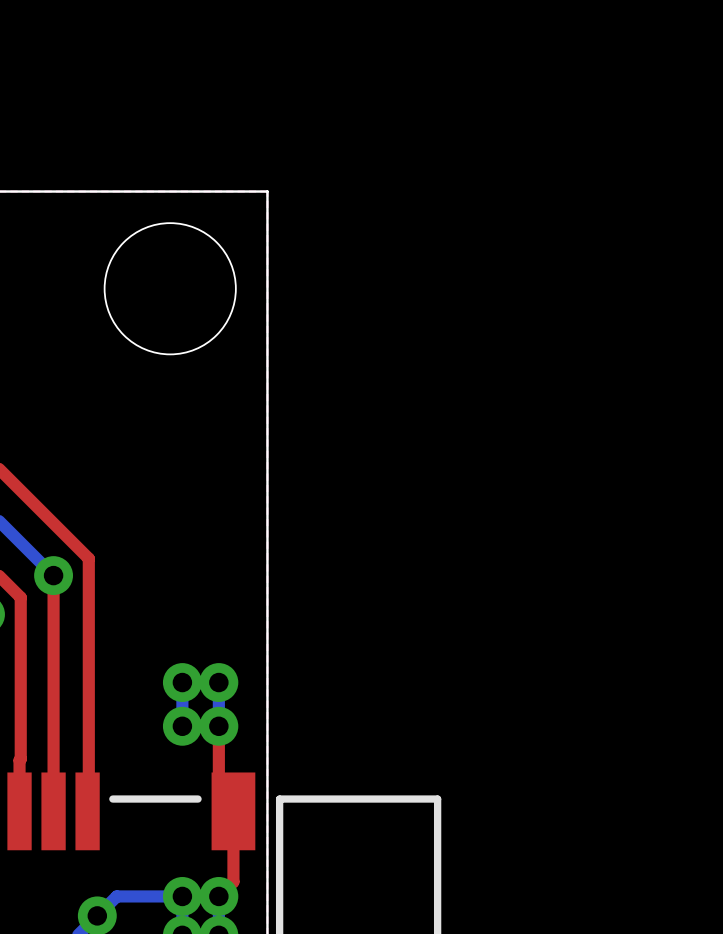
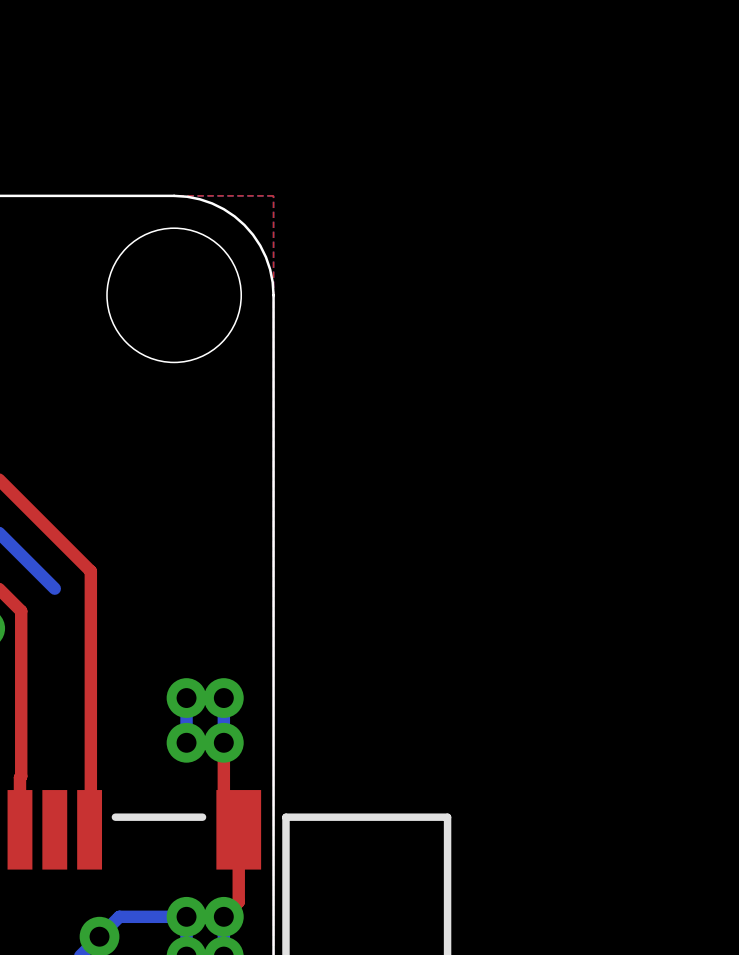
board edge: (170, 191) (267, 191) (267, 288) -> (174, 195) (199, 199) (212, 203) (234, 216) (244, 225) (260, 245) (265, 257) (270, 269) (273, 295)
top track: (53, 575) (53, 811) -> none
via: (53, 575) -> none

